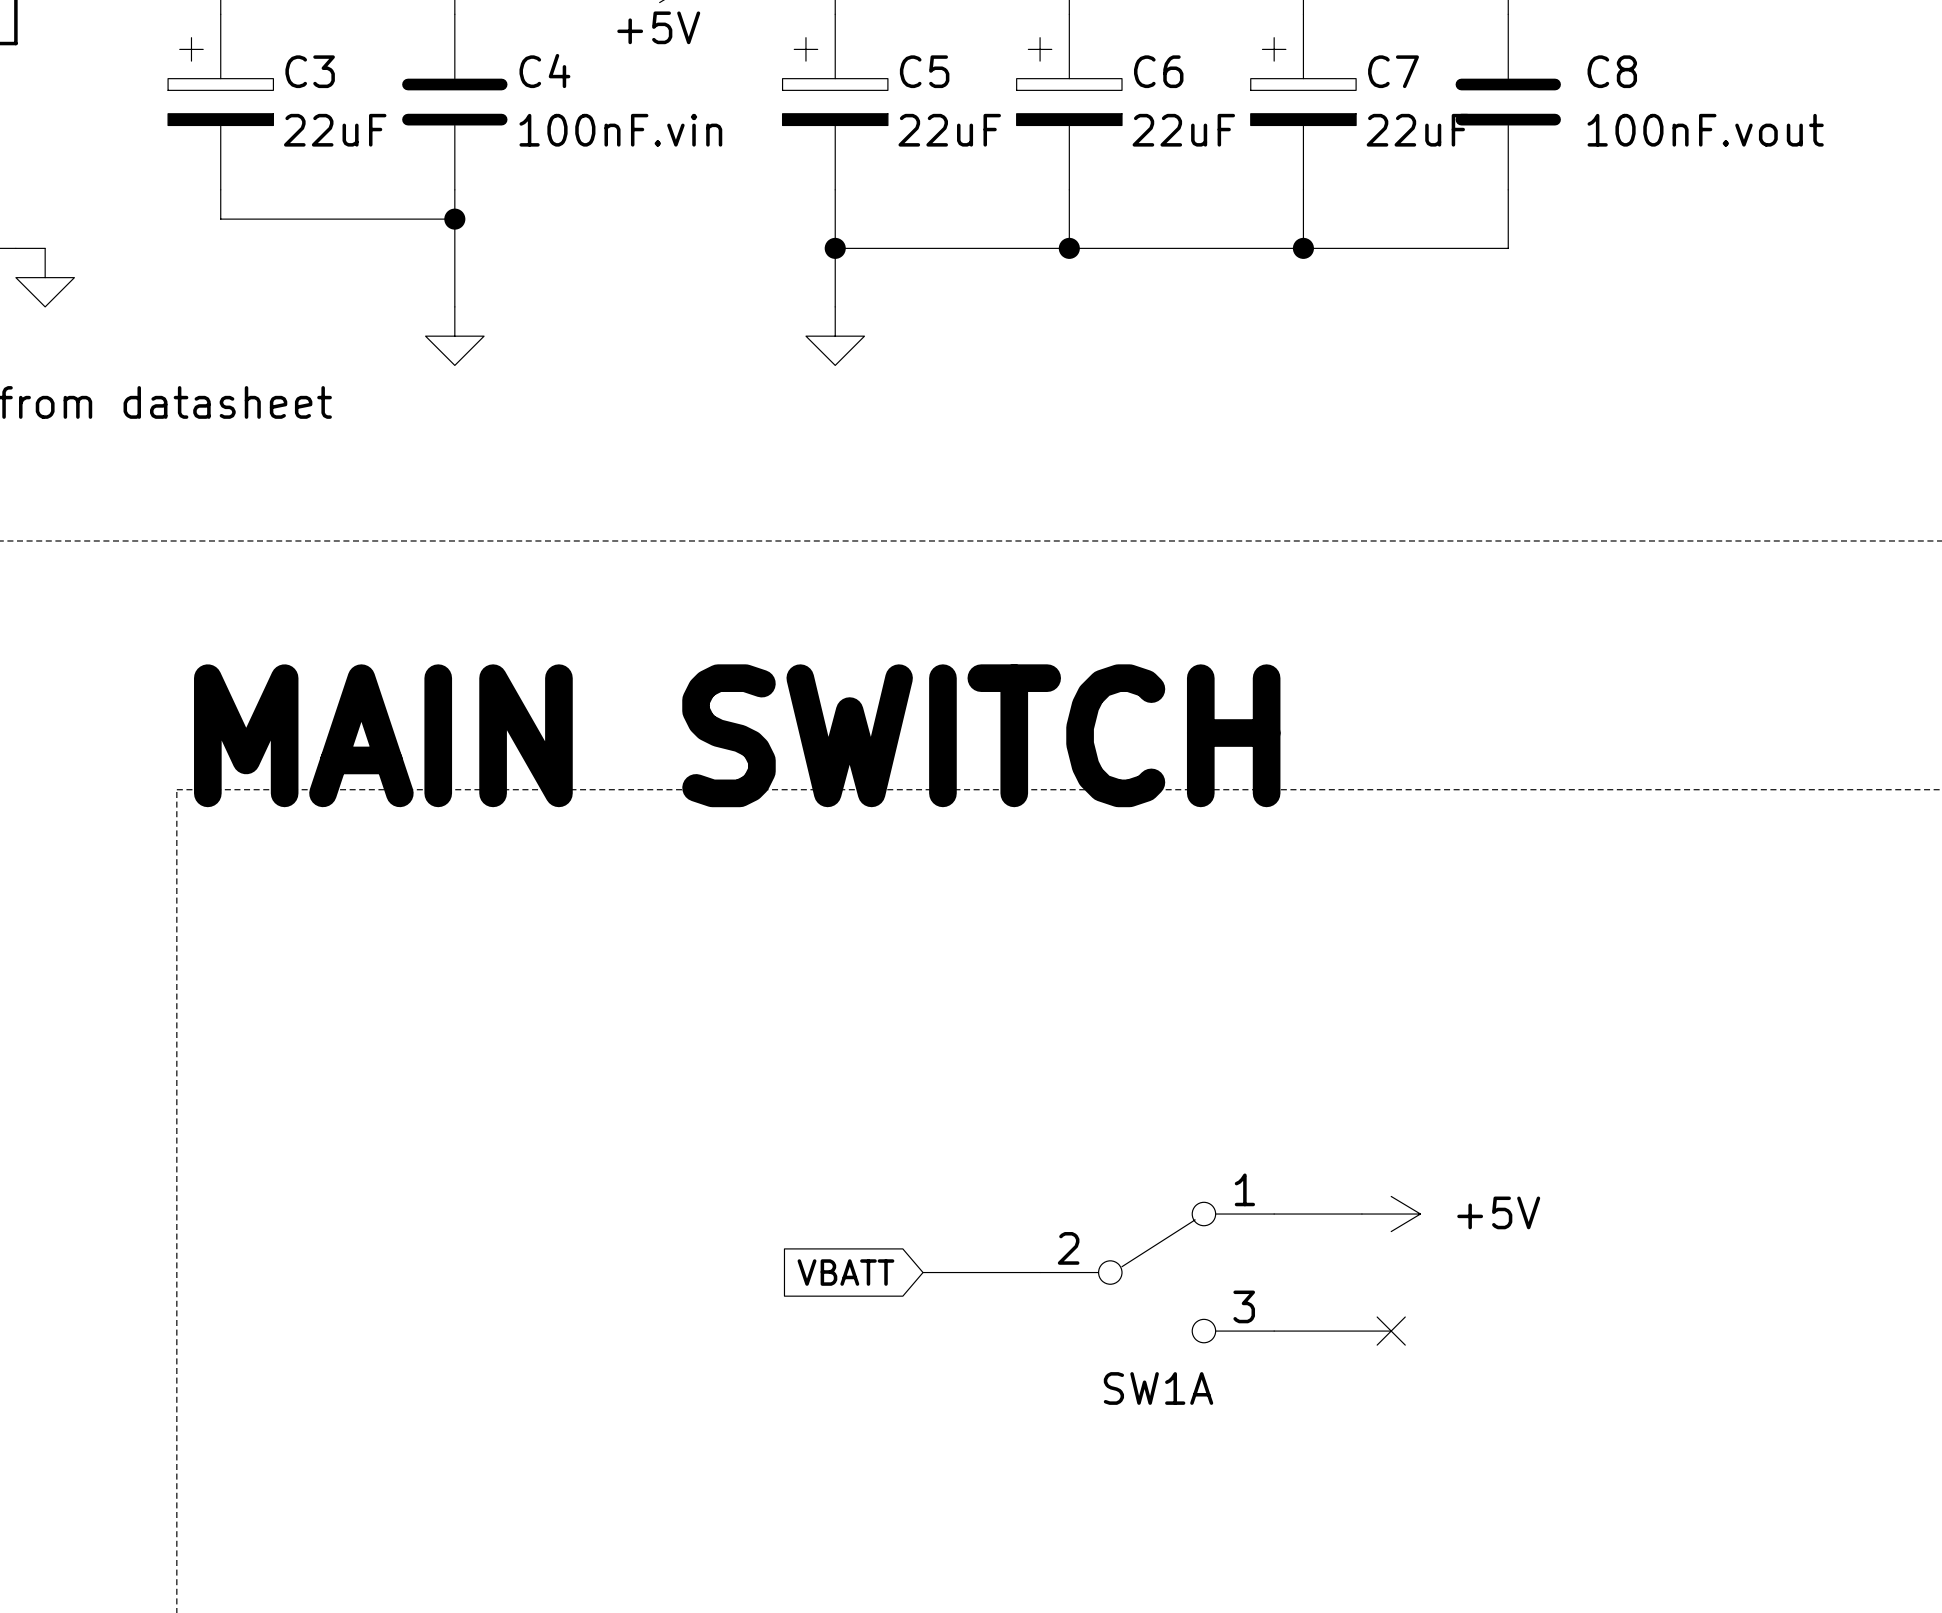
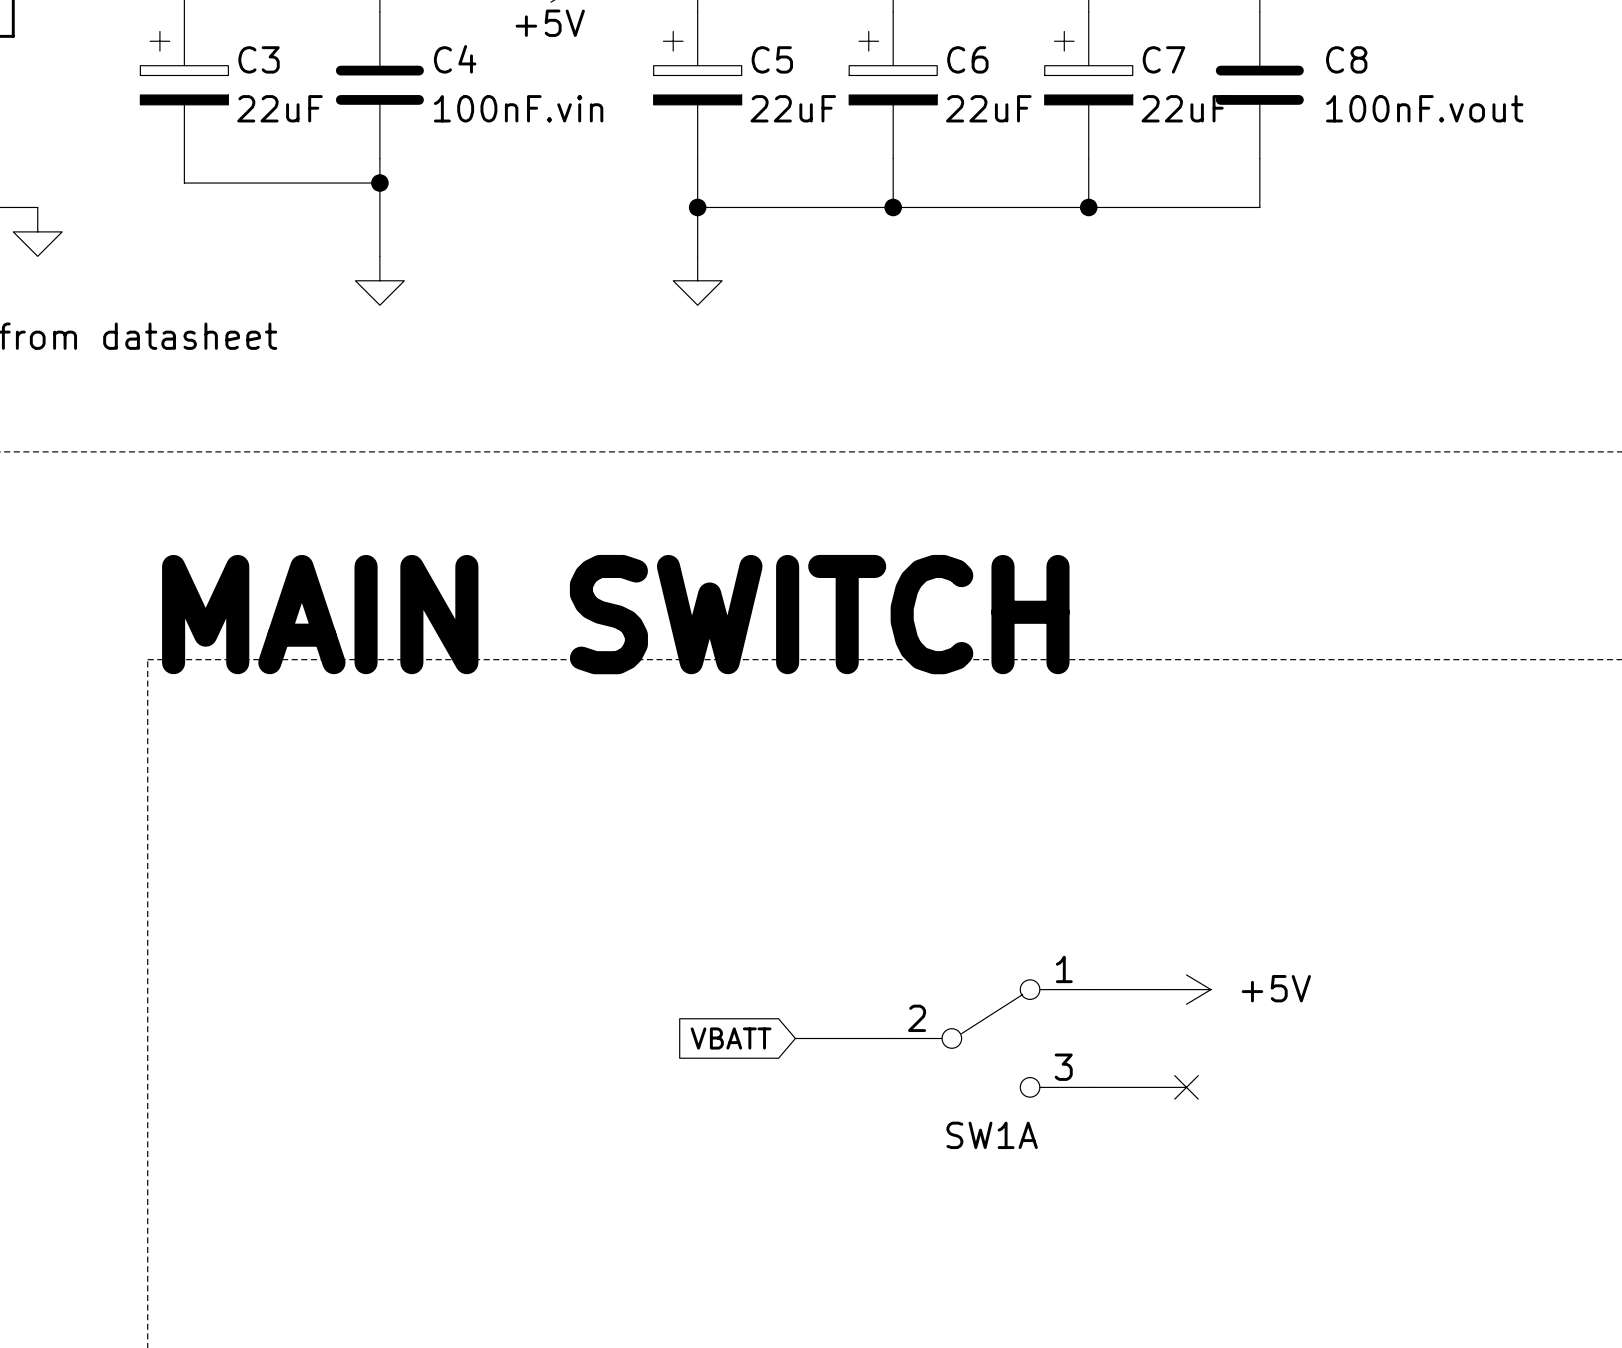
wire: (1274, 1214) (1361, 1214) -> (1088, 989) (1162, 989)
power symbol position: +5V (1391, 1214) -> +5V (1186, 989)
global label position: VBATT (845, 1272) -> VBATT (731, 1038)
wire: (923, 1272) (1040, 1272) -> (795, 1038) (893, 1038)
SW1A position: (1157, 1272) -> (990, 1038)
wire: (1274, 1331) (1391, 1331) -> (1088, 1087) (1186, 1087)
no-connect mark position: (1391, 1331) -> (1186, 1087)

